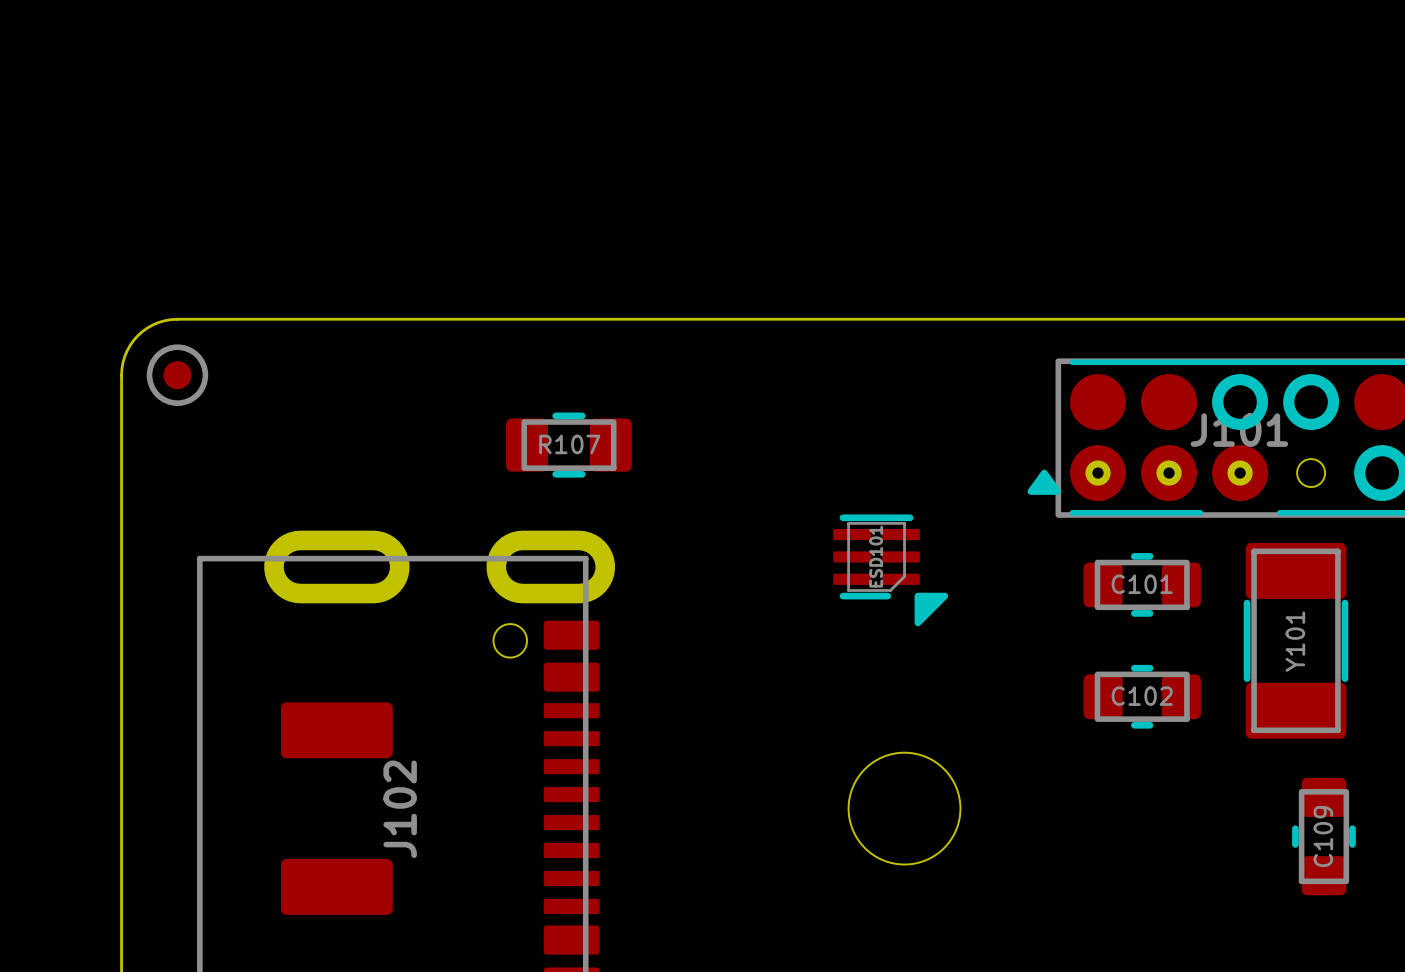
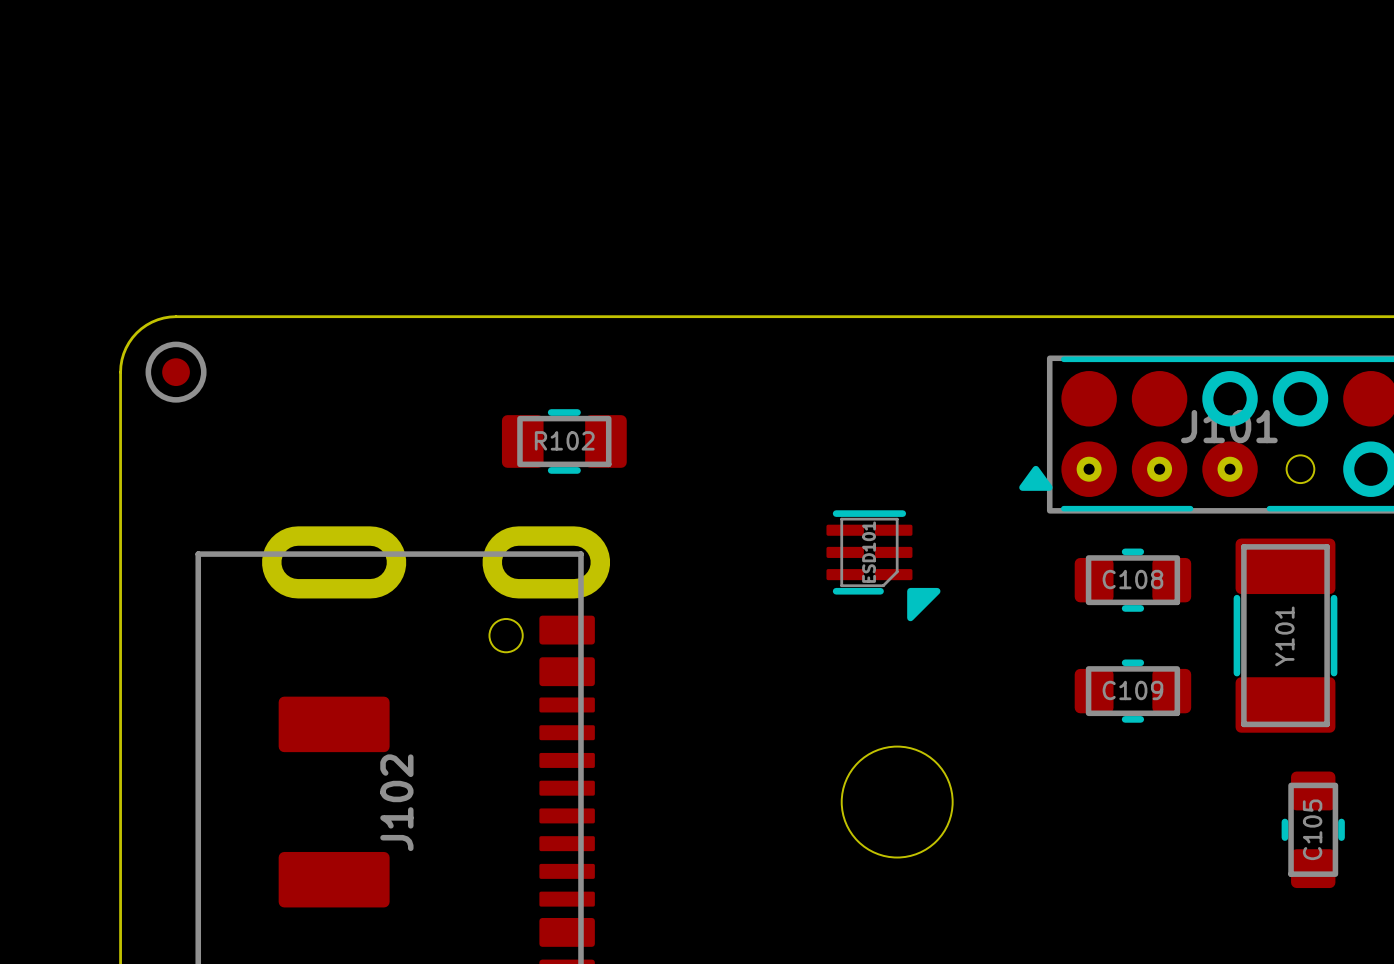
R107 name: R107 (569, 444) -> R102 (564, 440)
C101 name: C101 (1142, 584) -> C108 (1132, 579)
C102 name: C102 (1142, 696) -> C109 (1132, 690)
C109 name: C109 (1323, 836) -> C105 (1312, 829)

